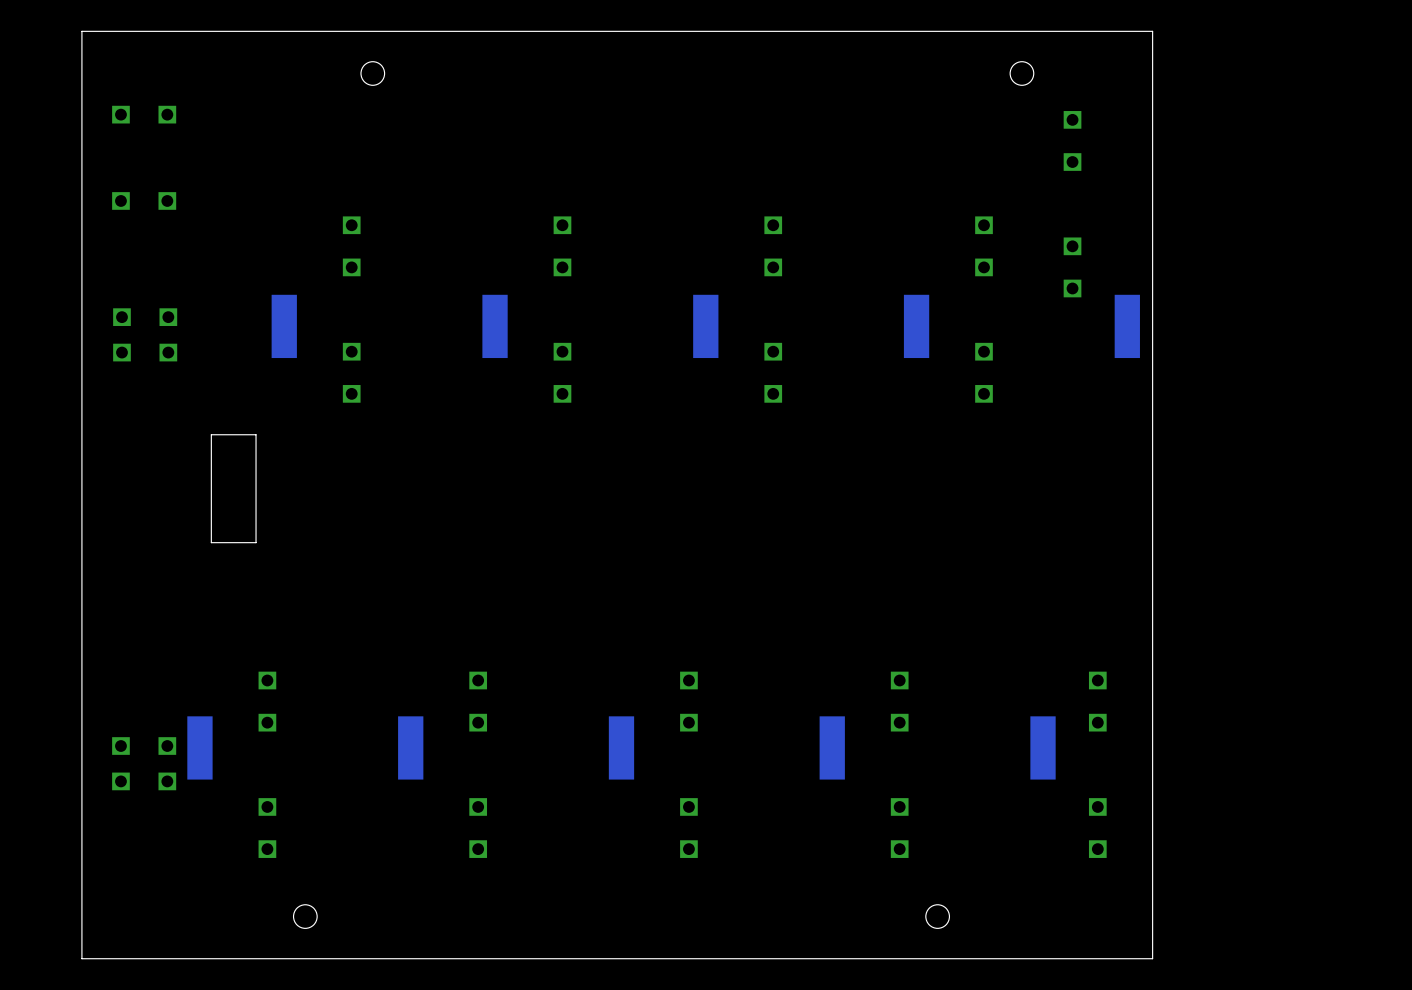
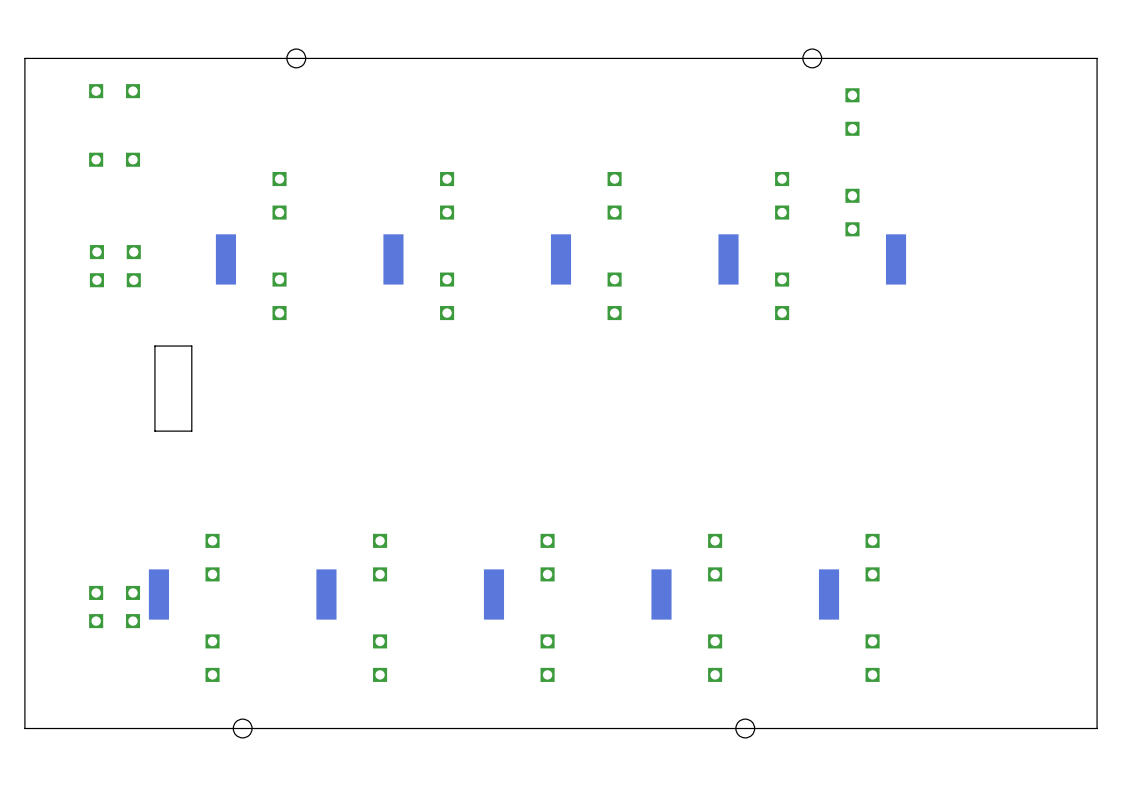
board edge: (1152, 31) (81, 31) (81, 958) (1152, 958) (1152, 31) -> (1097, 58) (1097, 728) (24, 728) (24, 58) (1097, 58)
part: none -> (173, 388)
part: (233, 488) -> none

